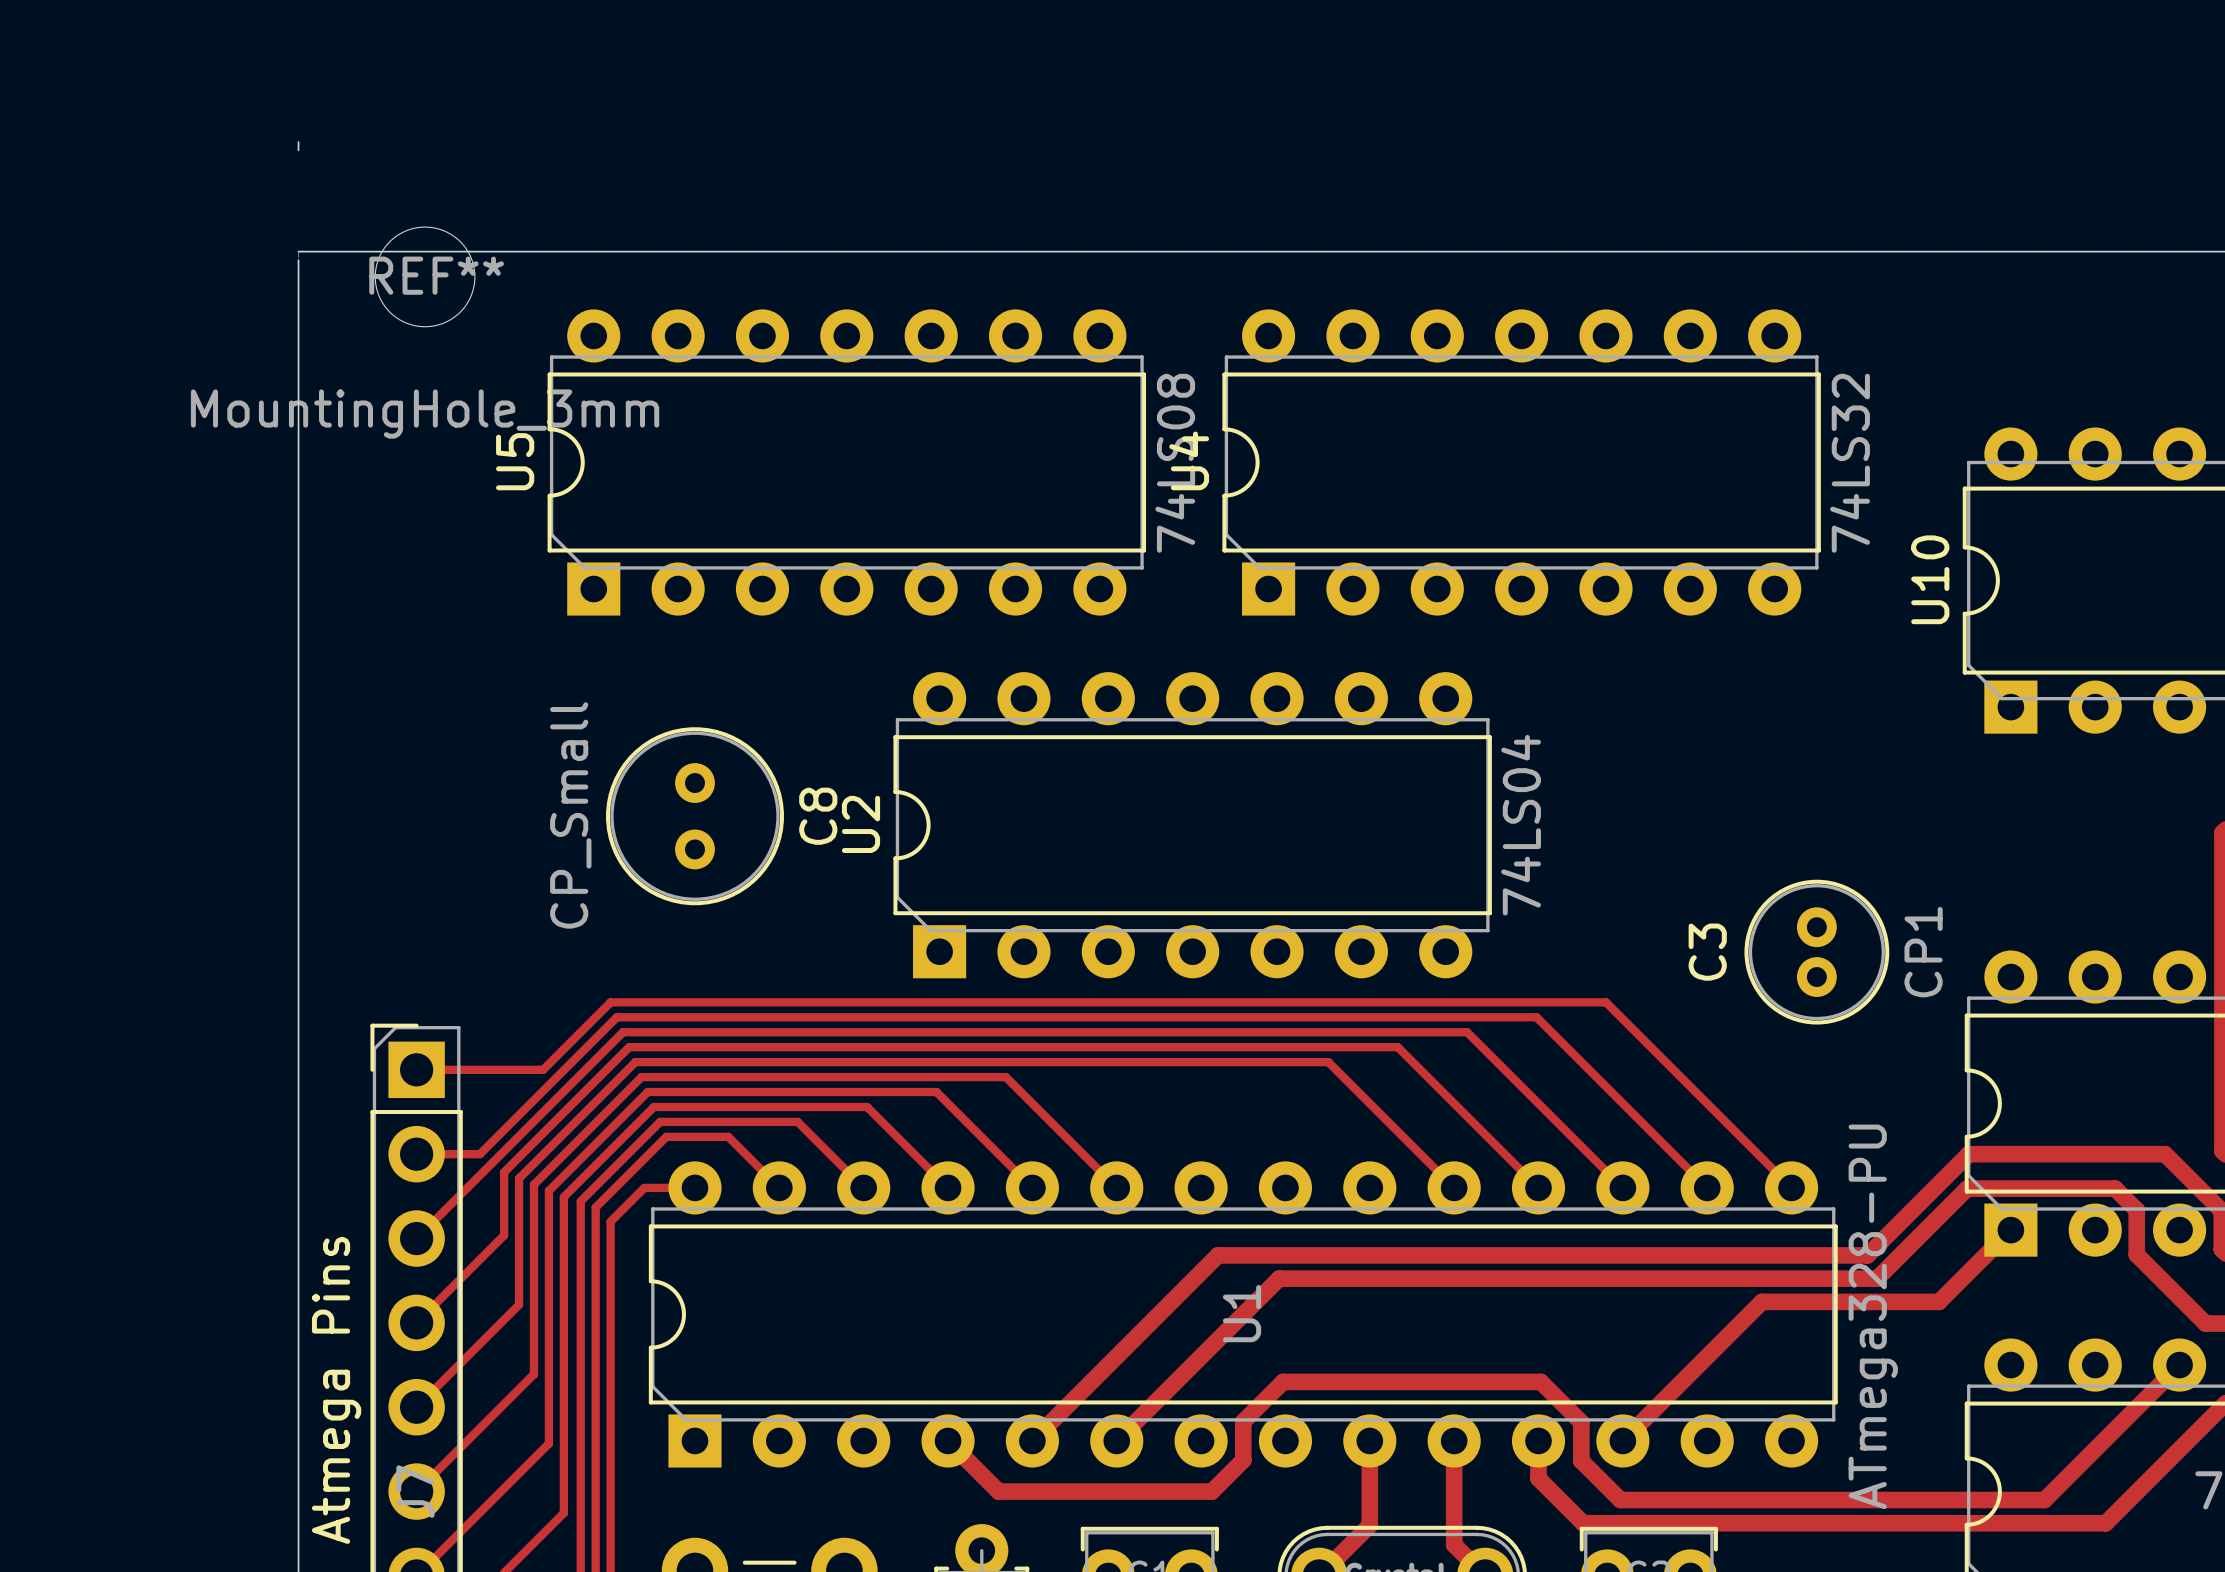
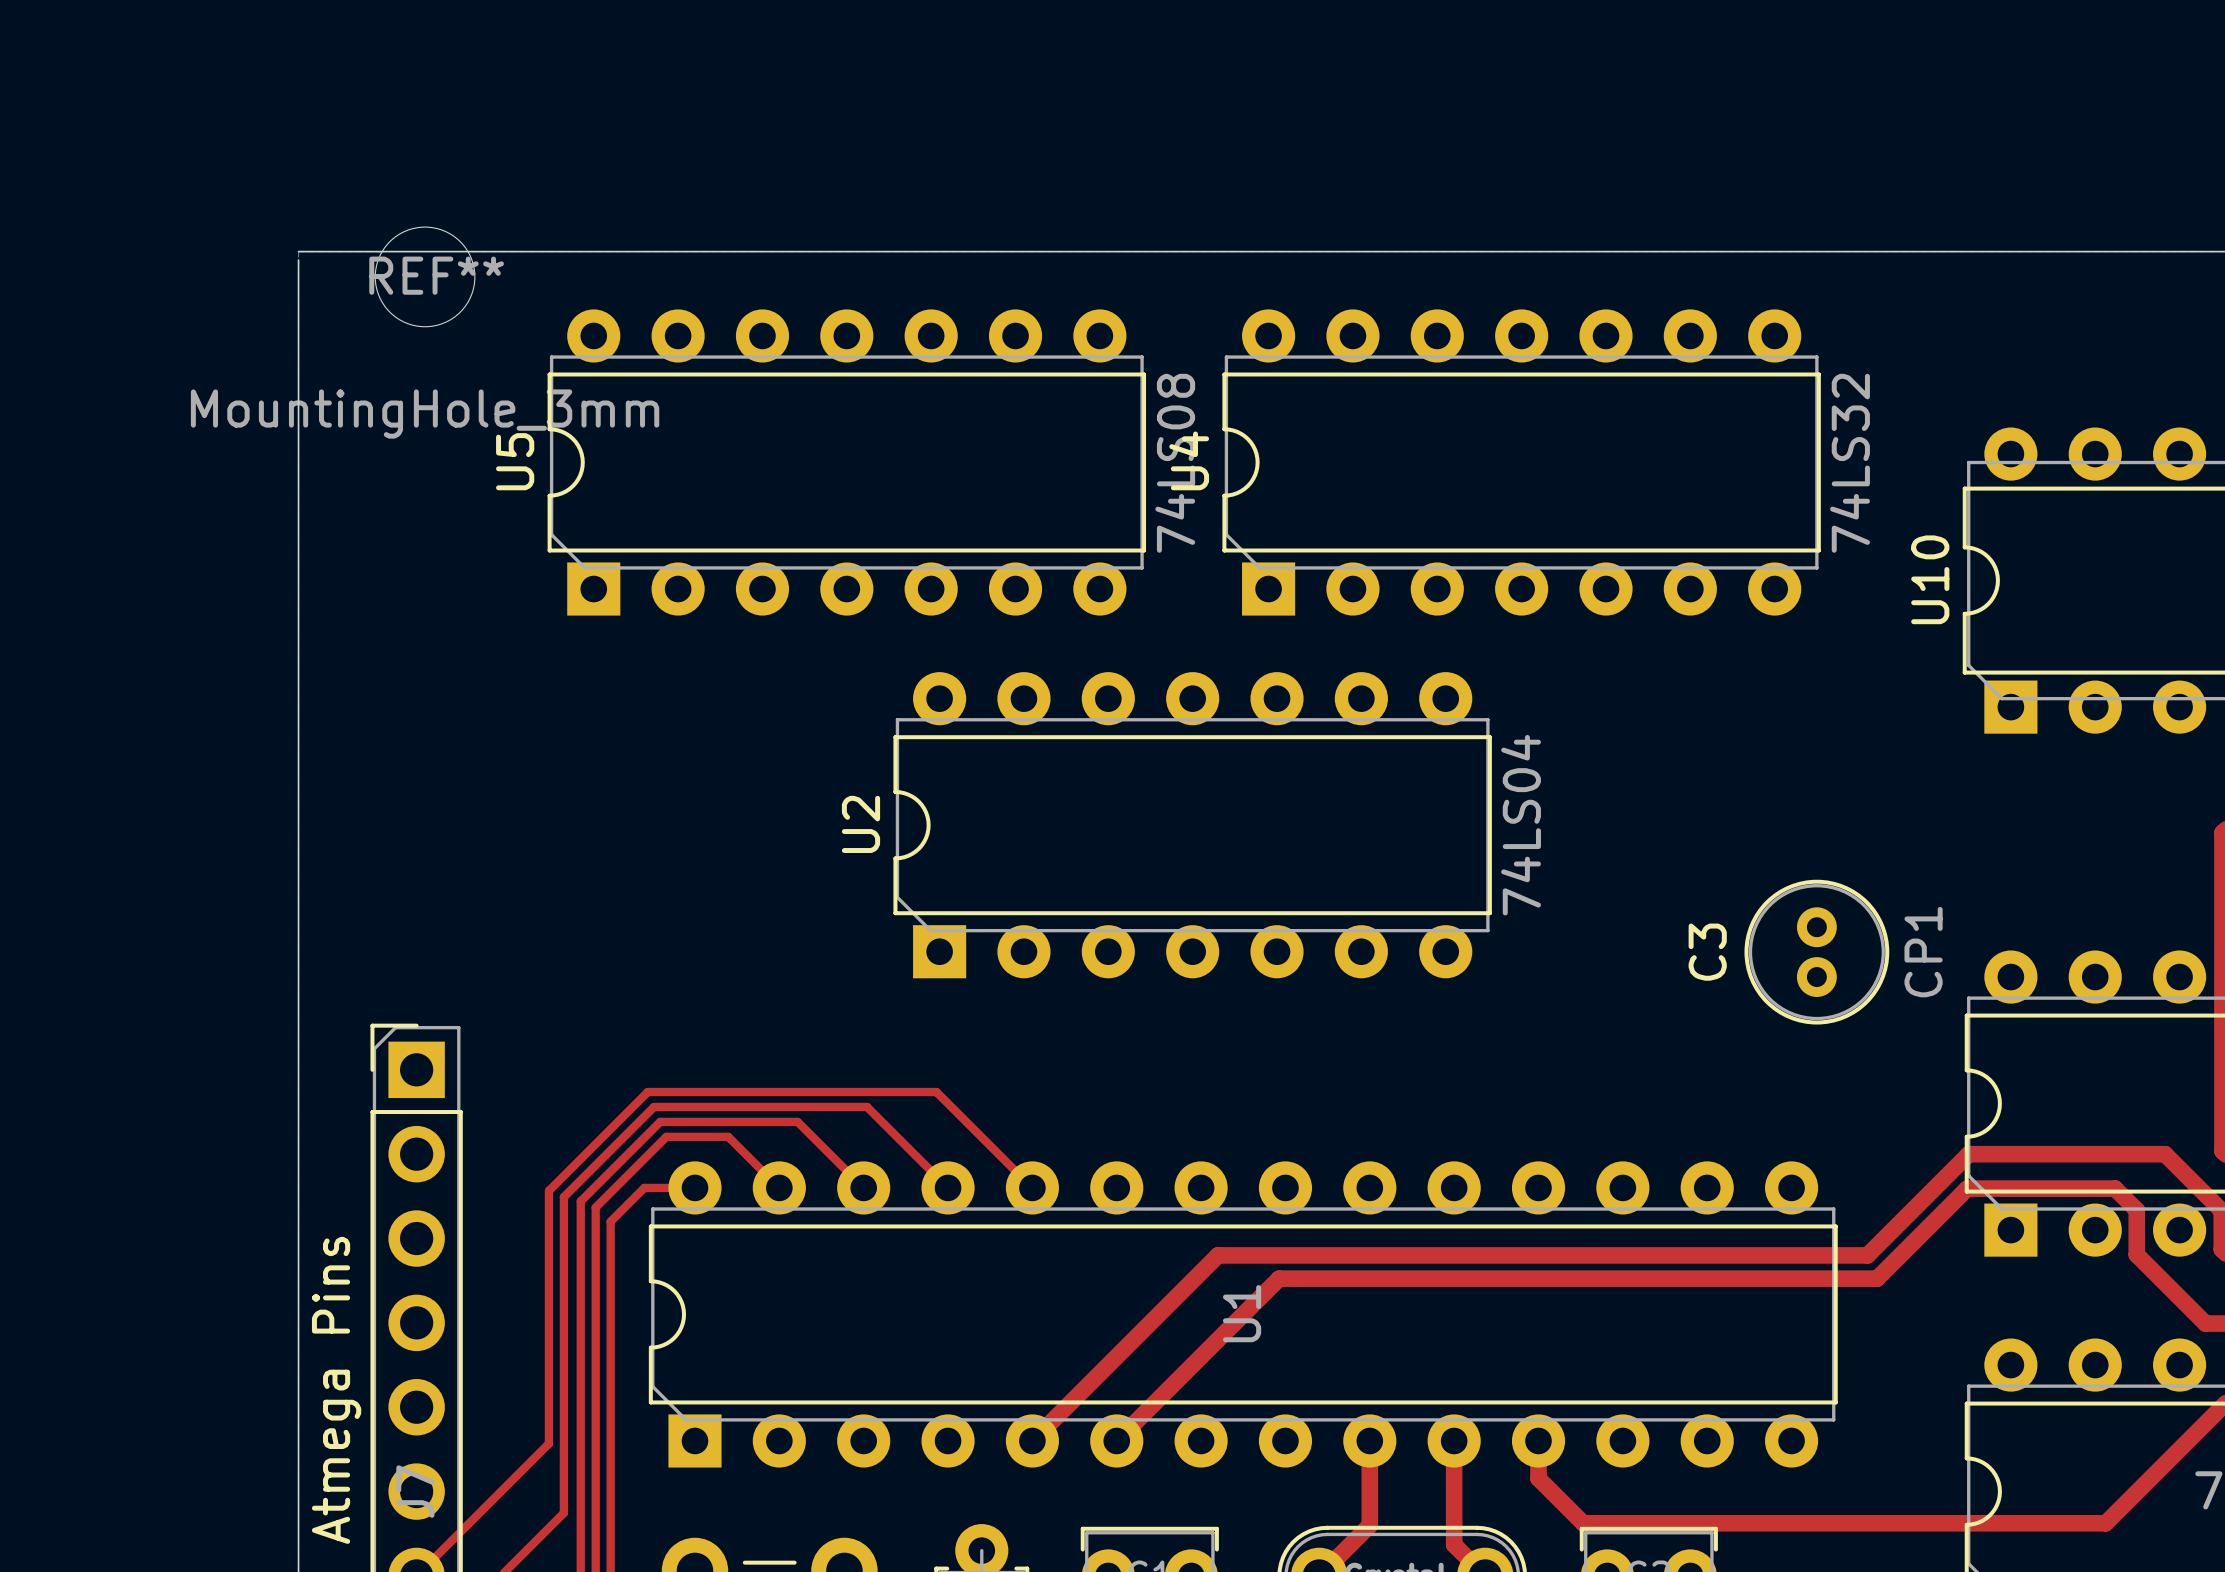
board edge: (298, 141) (298, 150) -> none
C8: CP_Small (694, 816) -> none
top track: (416, 1069) (543, 1069) (610, 1002) (1606, 1002) (1791, 1187) -> none
top track: (416, 1154) (479, 1154) (616, 1017) (1536, 1017) (1707, 1187) -> none
top track: (1116, 1187) (1005, 1077) (641, 1077) (533, 1184) (533, 1374) (416, 1491) -> none
top track: (1454, 1187) (1328, 1062) (635, 1062) (519, 1178) (519, 1304) (416, 1407) -> none
top track: (1538, 1187) (1397, 1047) (629, 1047) (504, 1172) (504, 1235) (416, 1322) -> none
top track: (1622, 1187) (1467, 1032) (623, 1032) (416, 1238) -> none
top track: (2010, 1230) (1939, 1301) (1761, 1301) (1622, 1440) -> none
U1 value: ATmega328-PU (1873, 1316) -> none
top track: (2179, 1365) (2044, 1500) (1620, 1500) (1581, 1460) (1581, 1422) (1540, 1381) (1283, 1381) (1243, 1421) (1243, 1460) (1211, 1491) (998, 1491) (948, 1440) -> none

